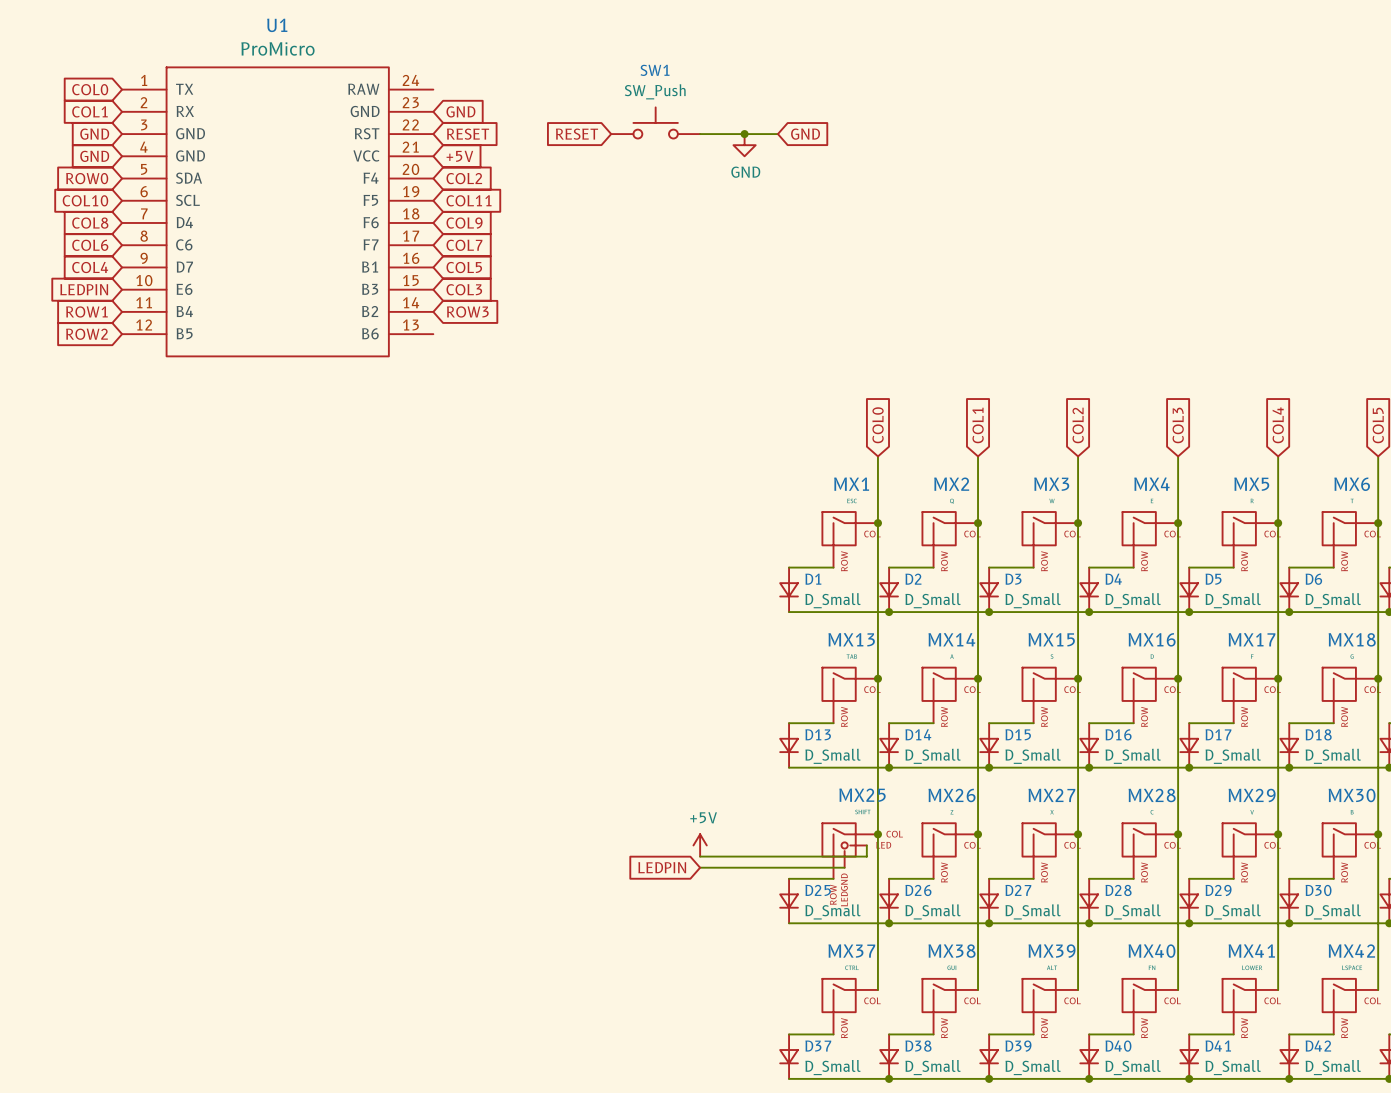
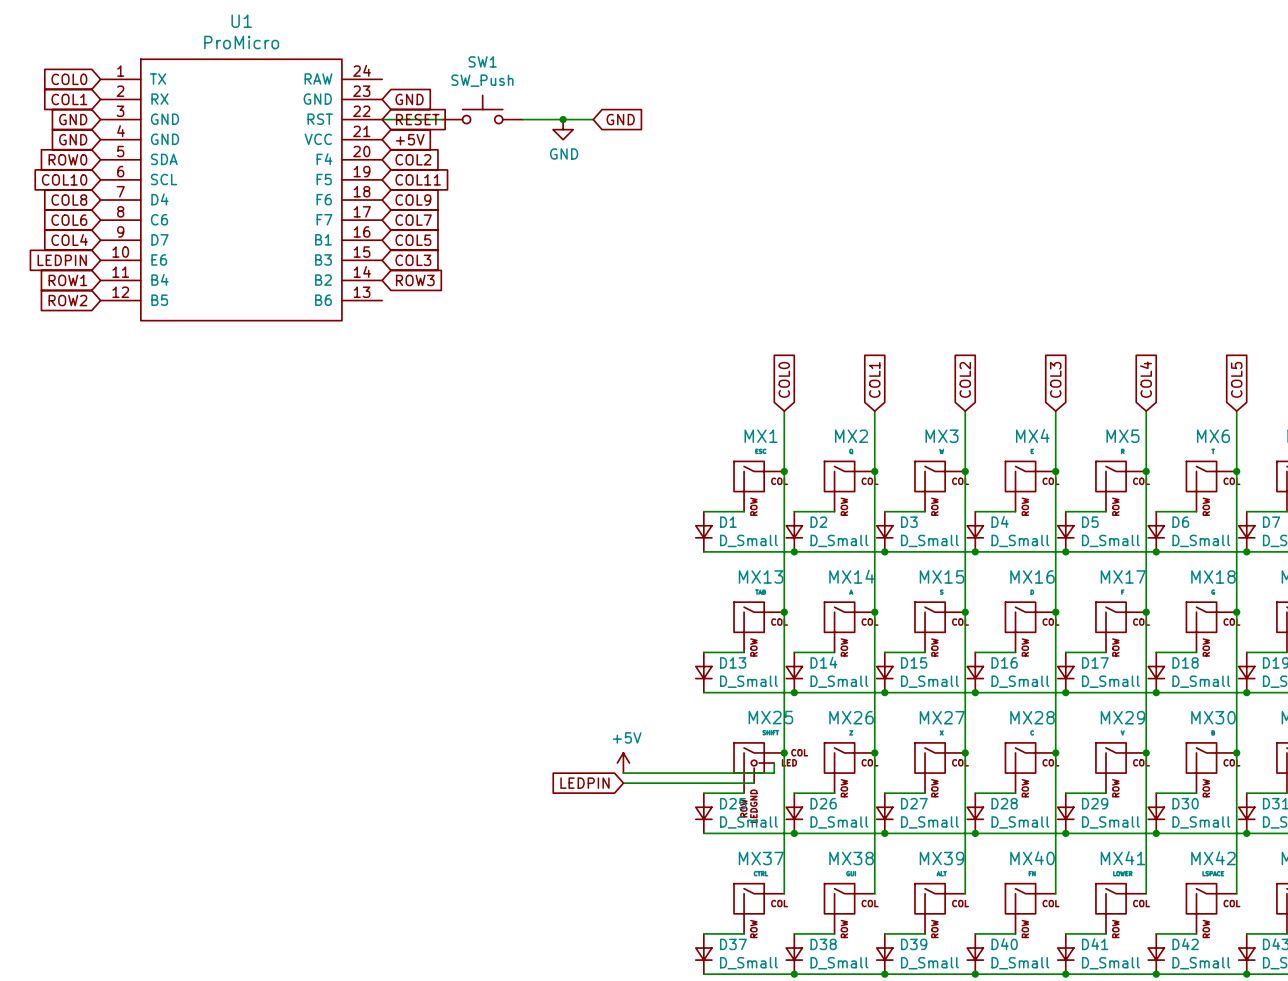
SW1 position: (655, 122) -> (482, 109)
wire: none -> (382, 119) (442, 119)
global label: RESET (577, 134) -> none
junction: none -> (563, 119)
wire: (700, 134) (777, 134) -> (522, 119) (593, 119)
junction: (744, 134) -> none
global label position: GND (805, 134) -> GND (620, 119)
power symbol position: GND (744, 145) -> GND (563, 129)

